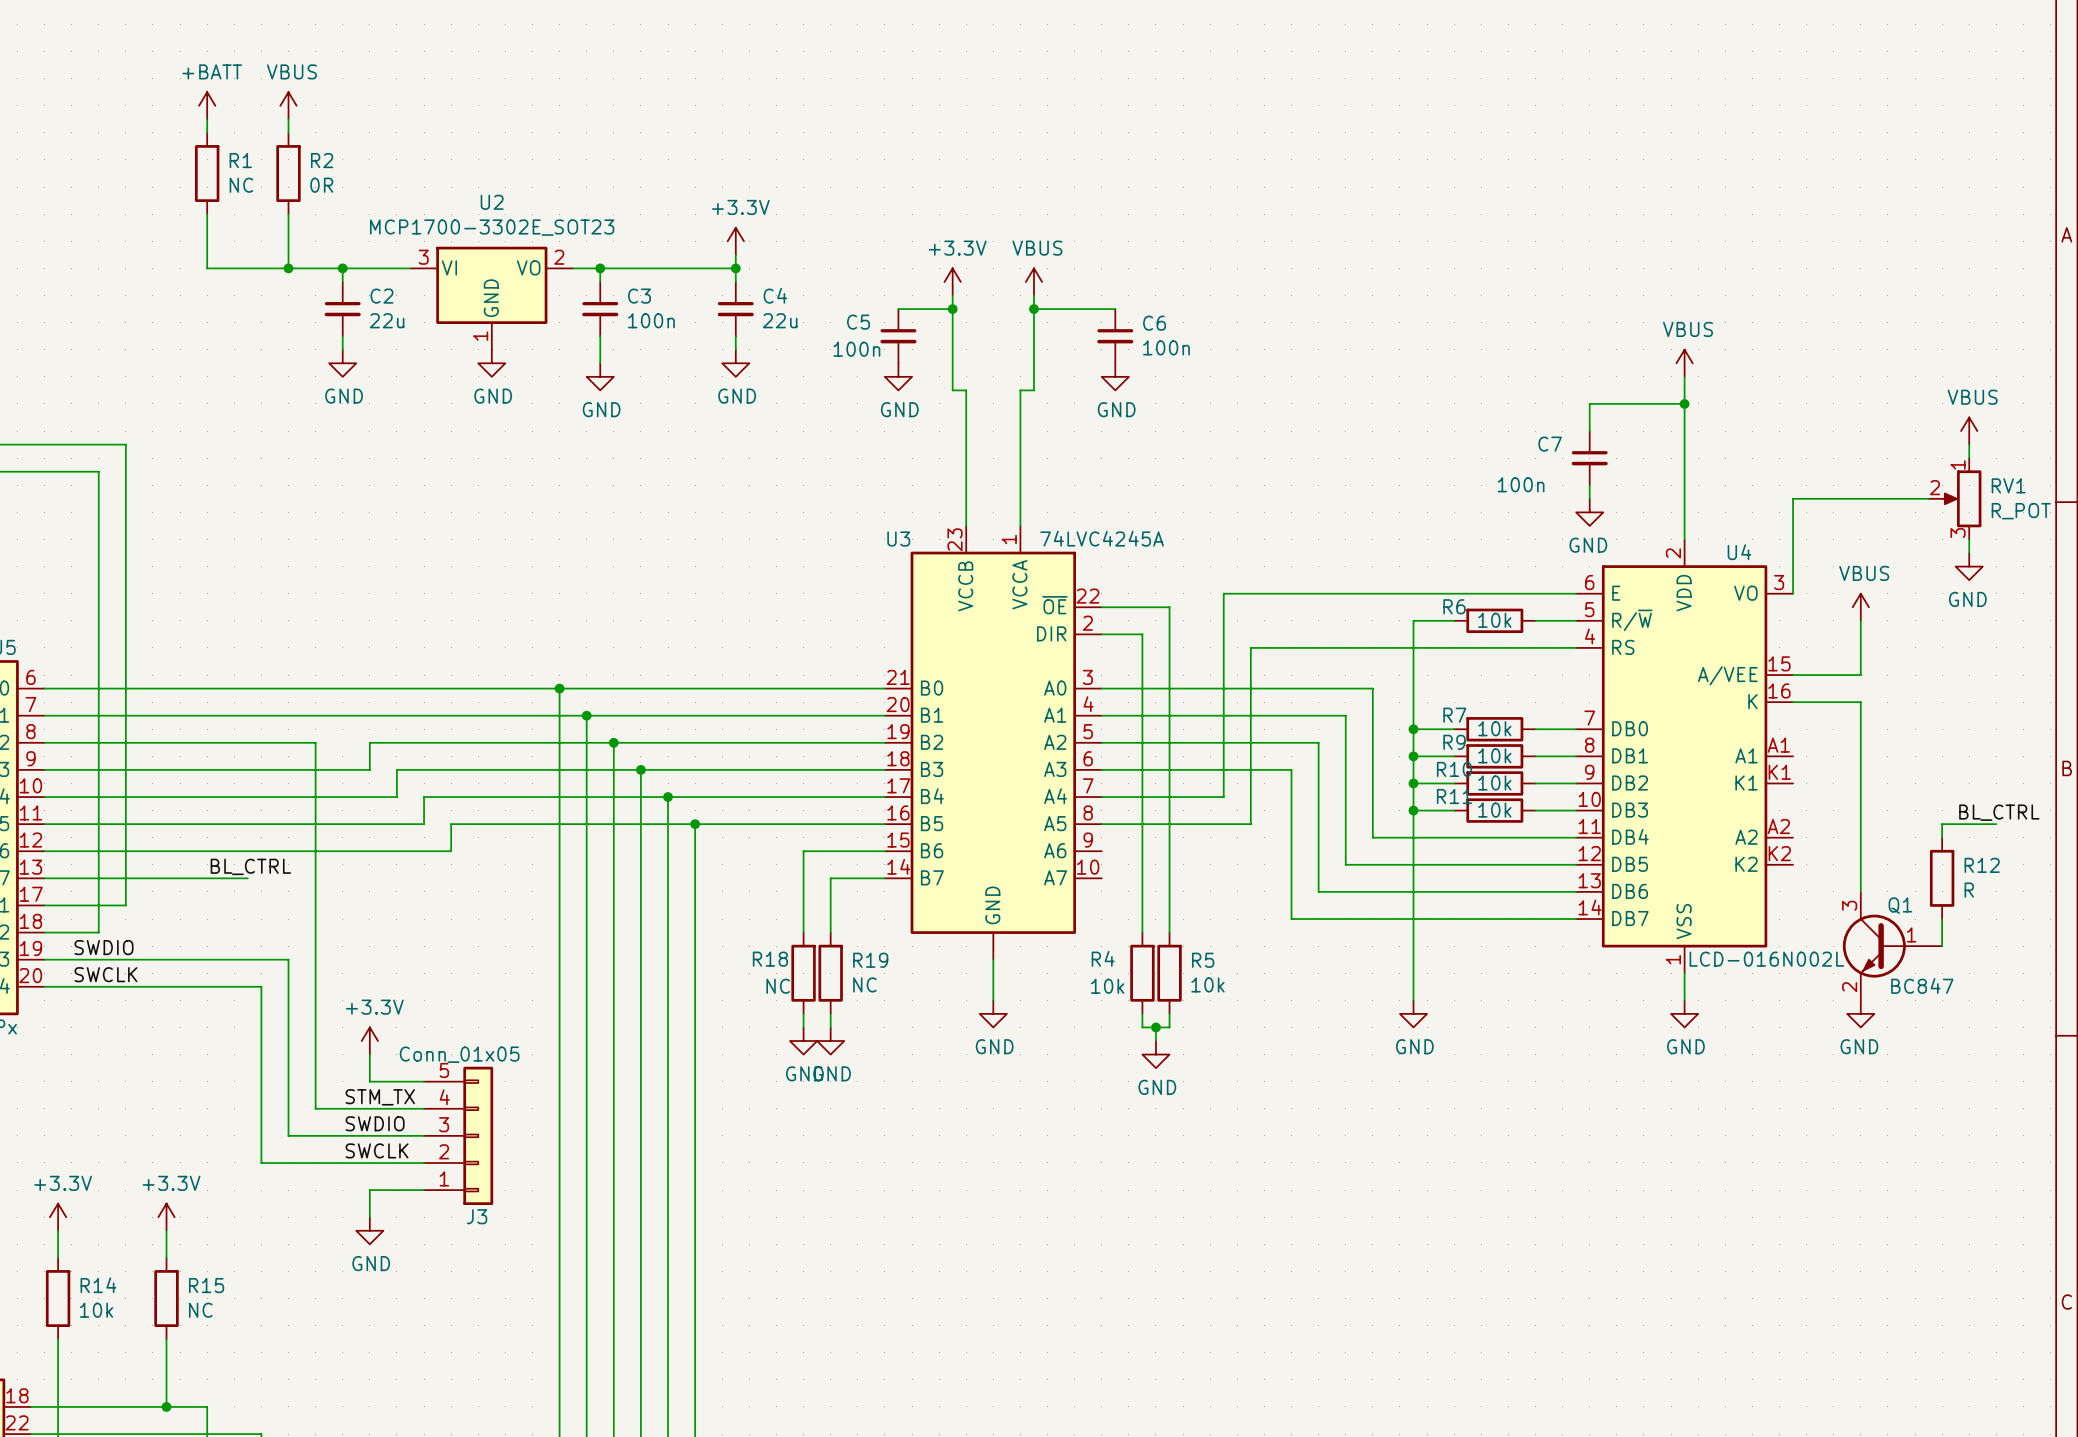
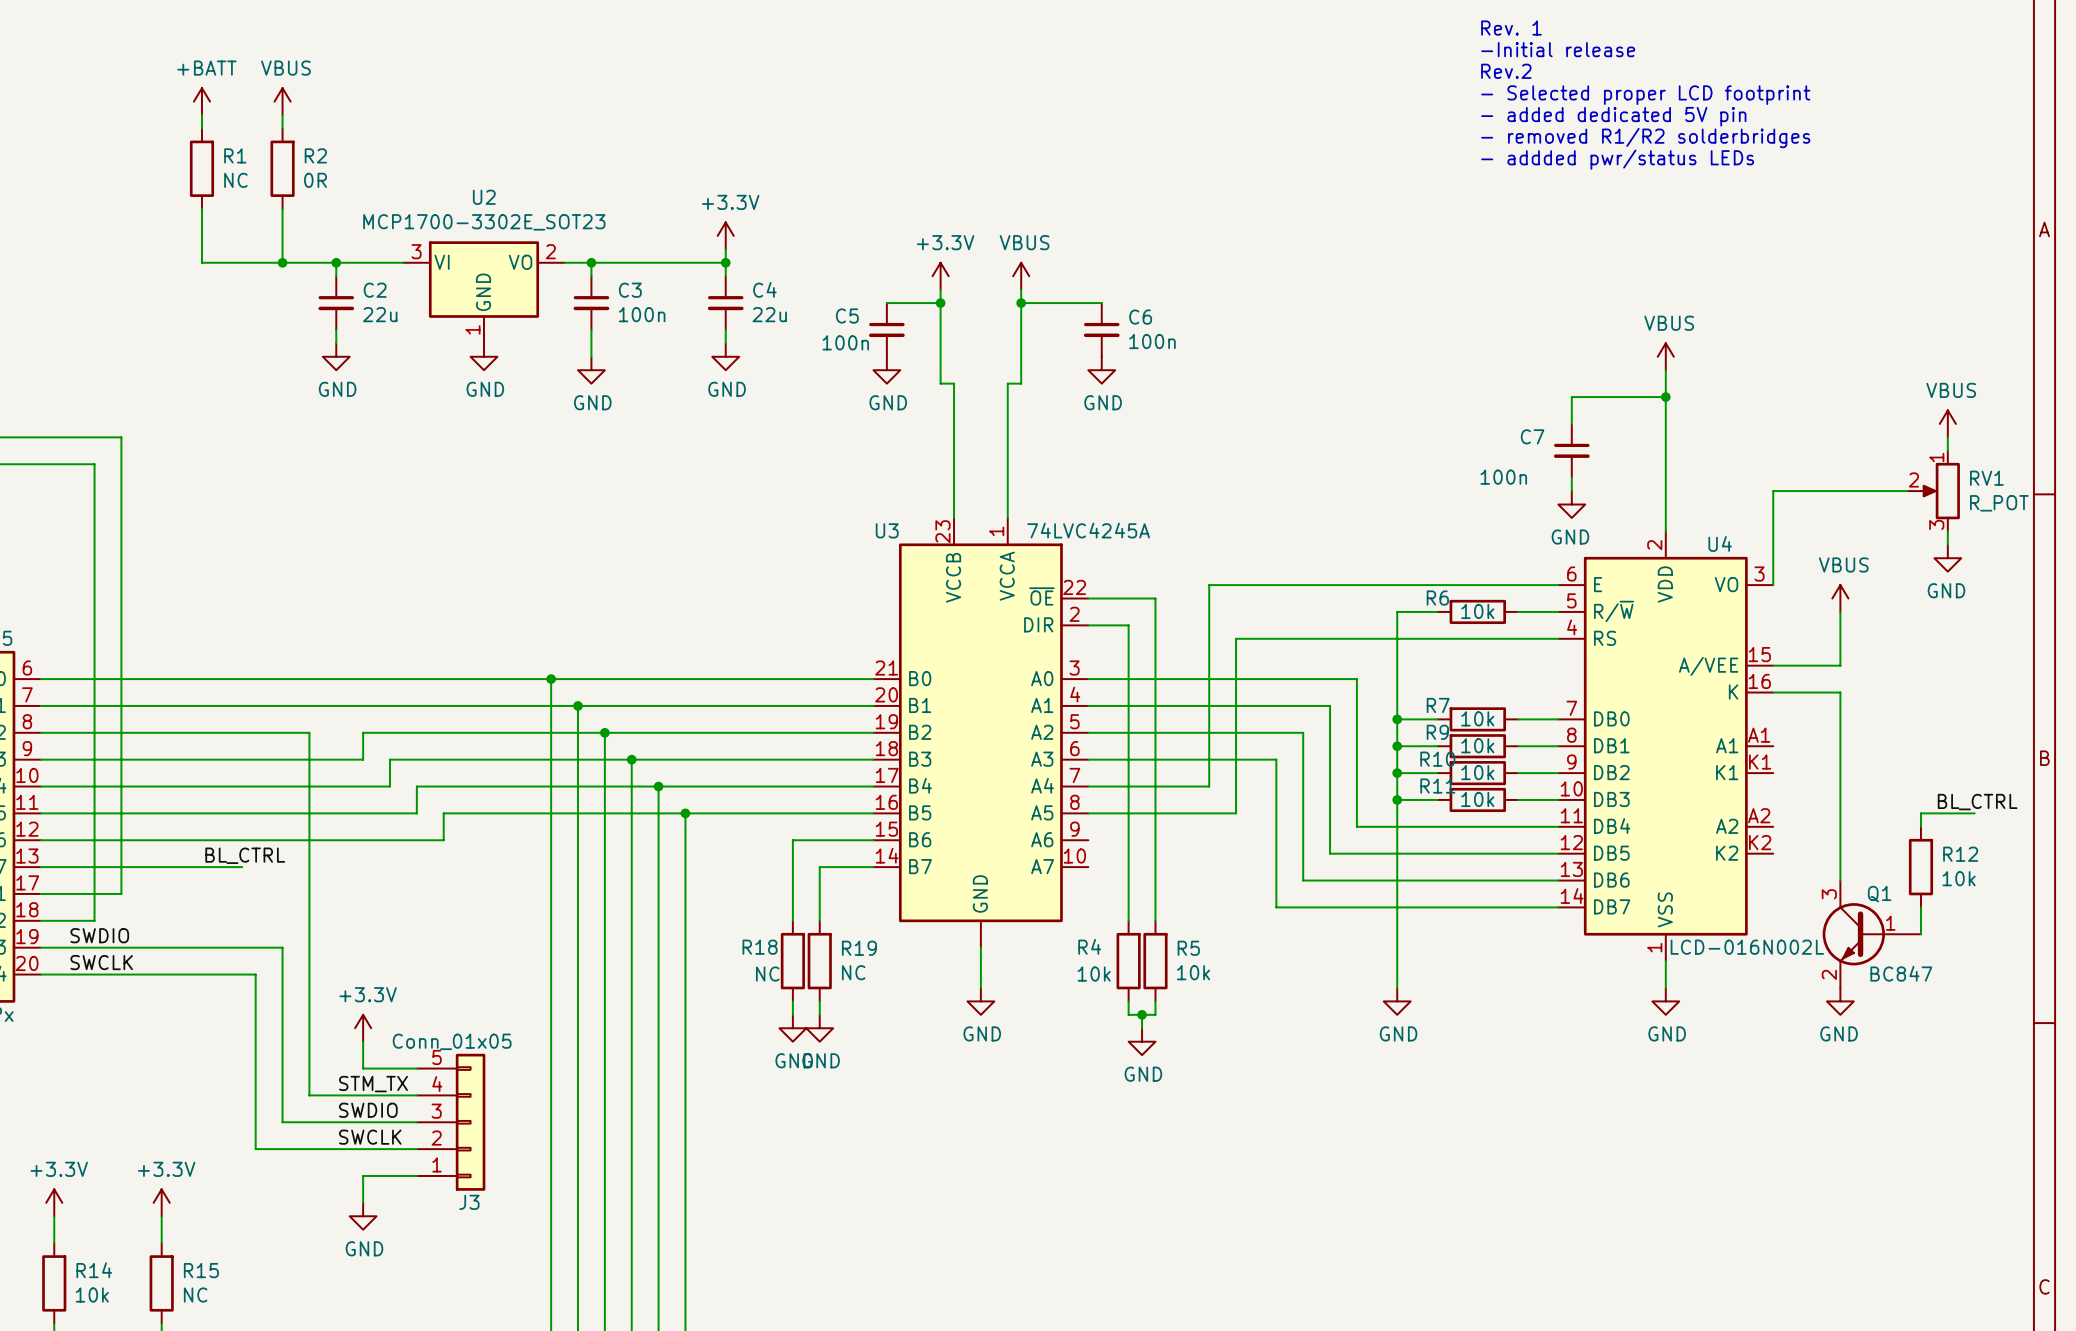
text: none -> Rev. 1 (1511, 28)
text: none -> -Initial release (1558, 49)
text: none -> Rev.2 (1506, 71)
text: none -> - Selected proper LCD footprint (1645, 95)
text: none -> - added dedicated 5V pin (1613, 116)
text: none -> - removed R1/R2 solderbridges (1645, 138)
text: none -> - addded pwr/status LEDs (1617, 159)
R12 value: R (1969, 890) -> 10k (1959, 878)

